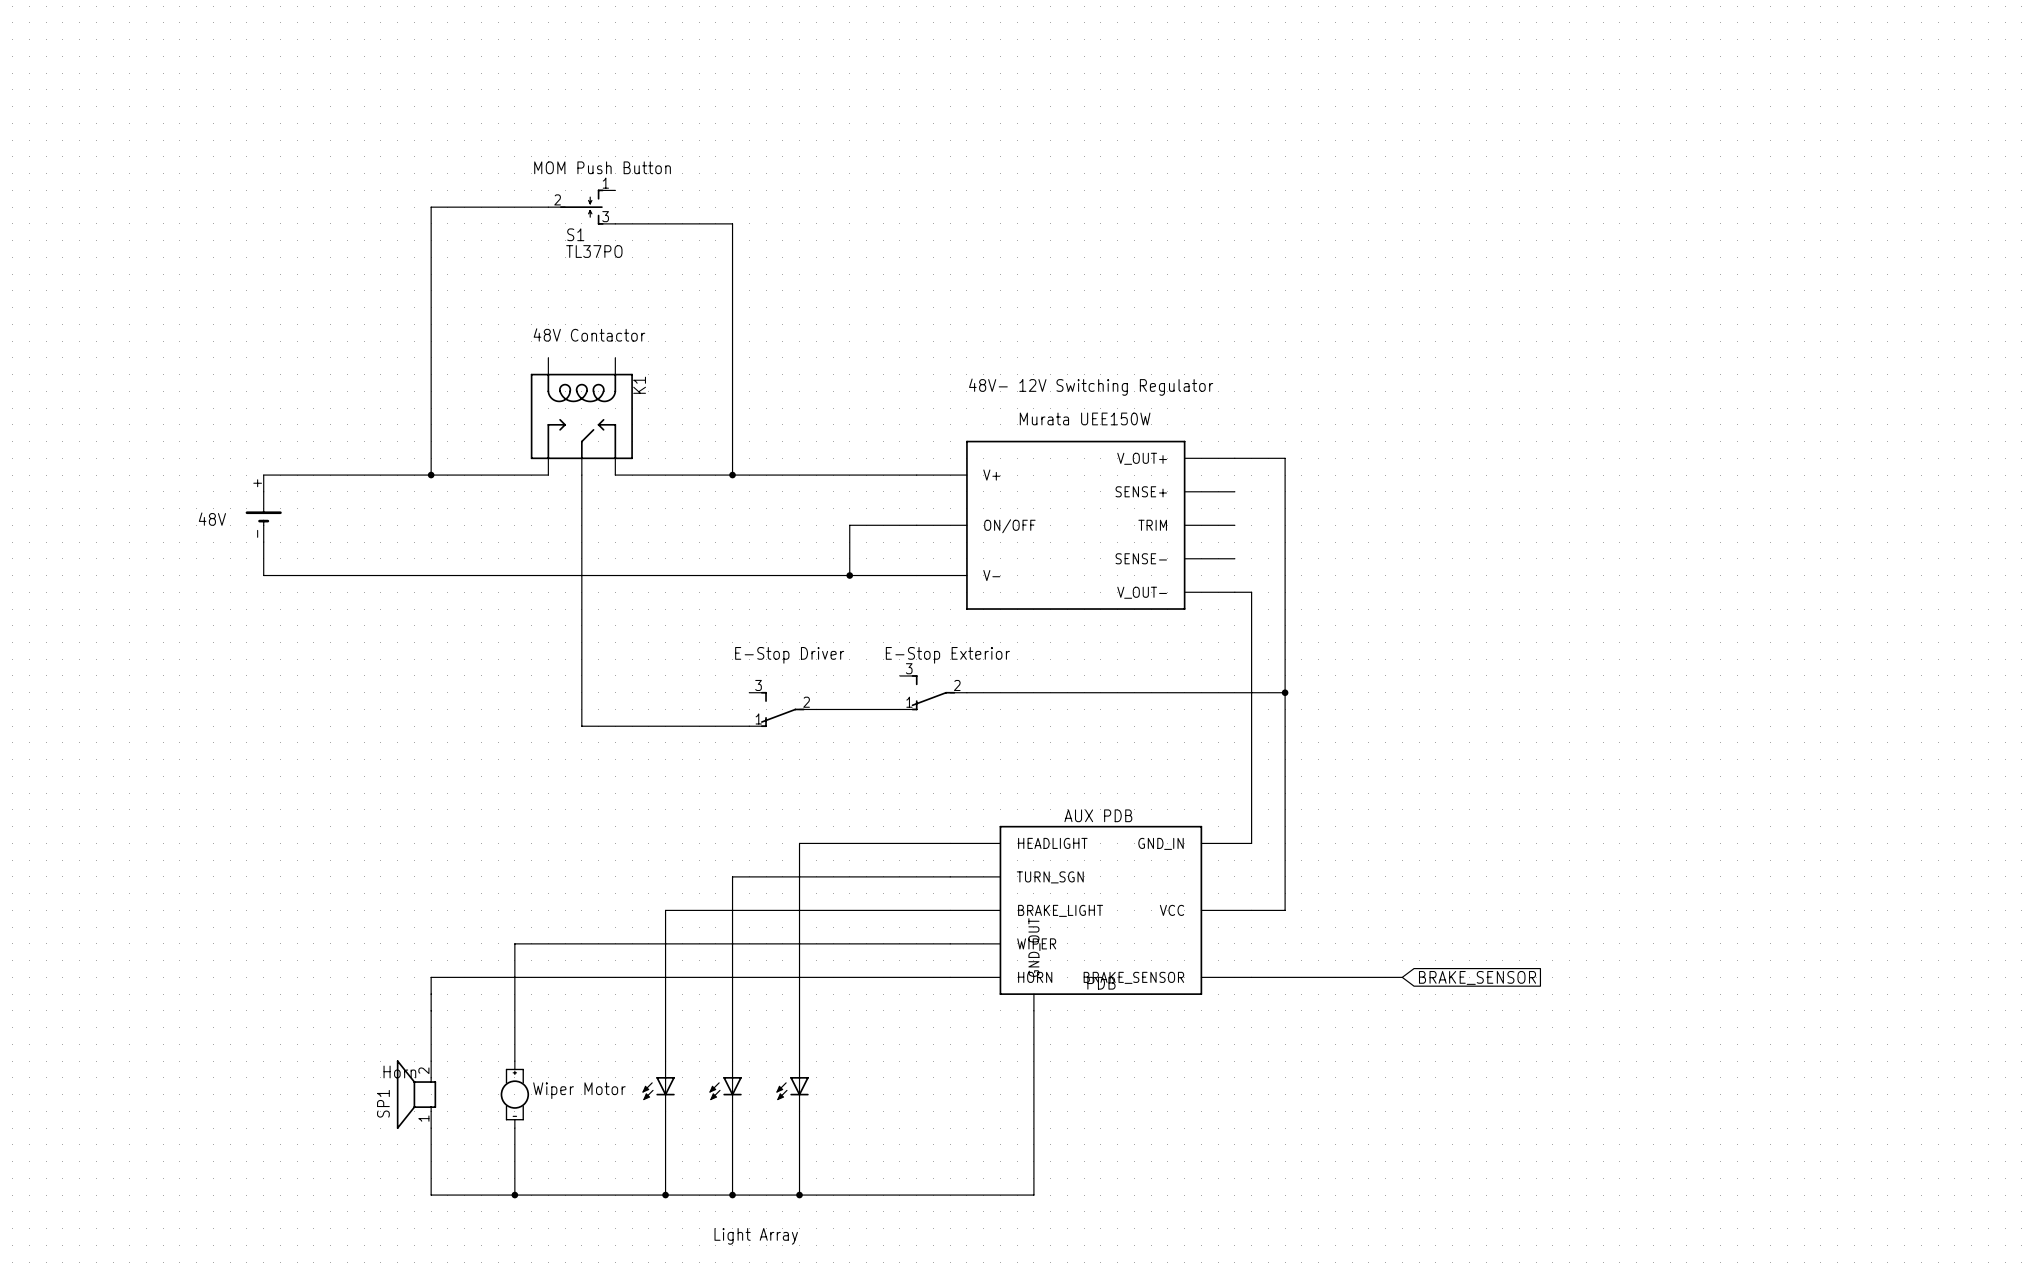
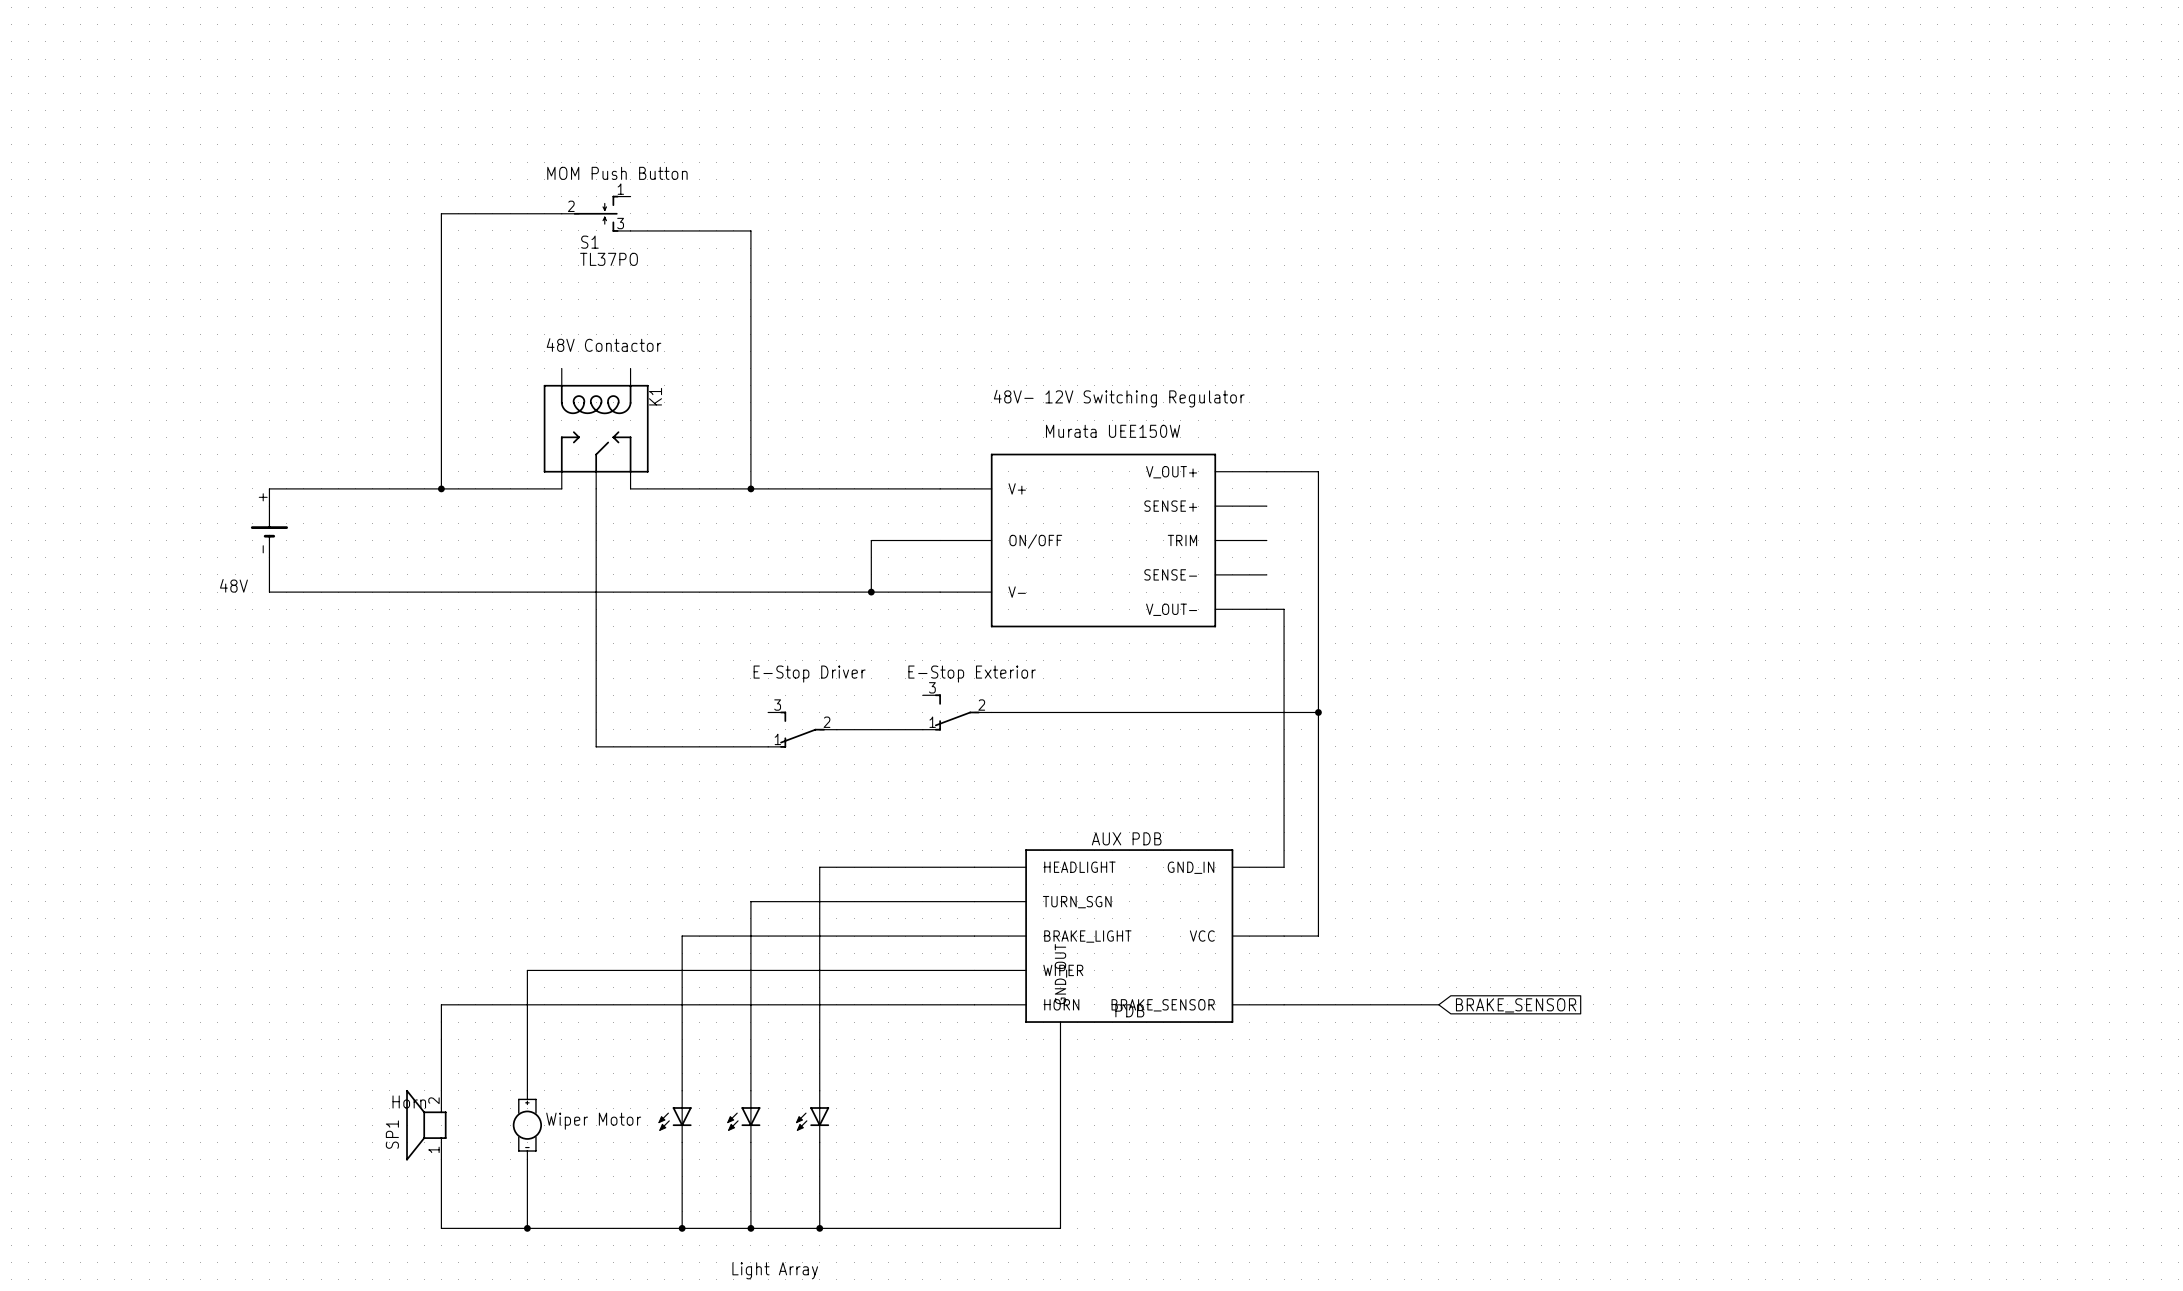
text position: 48V (212, 519) -> 48V (233, 585)

